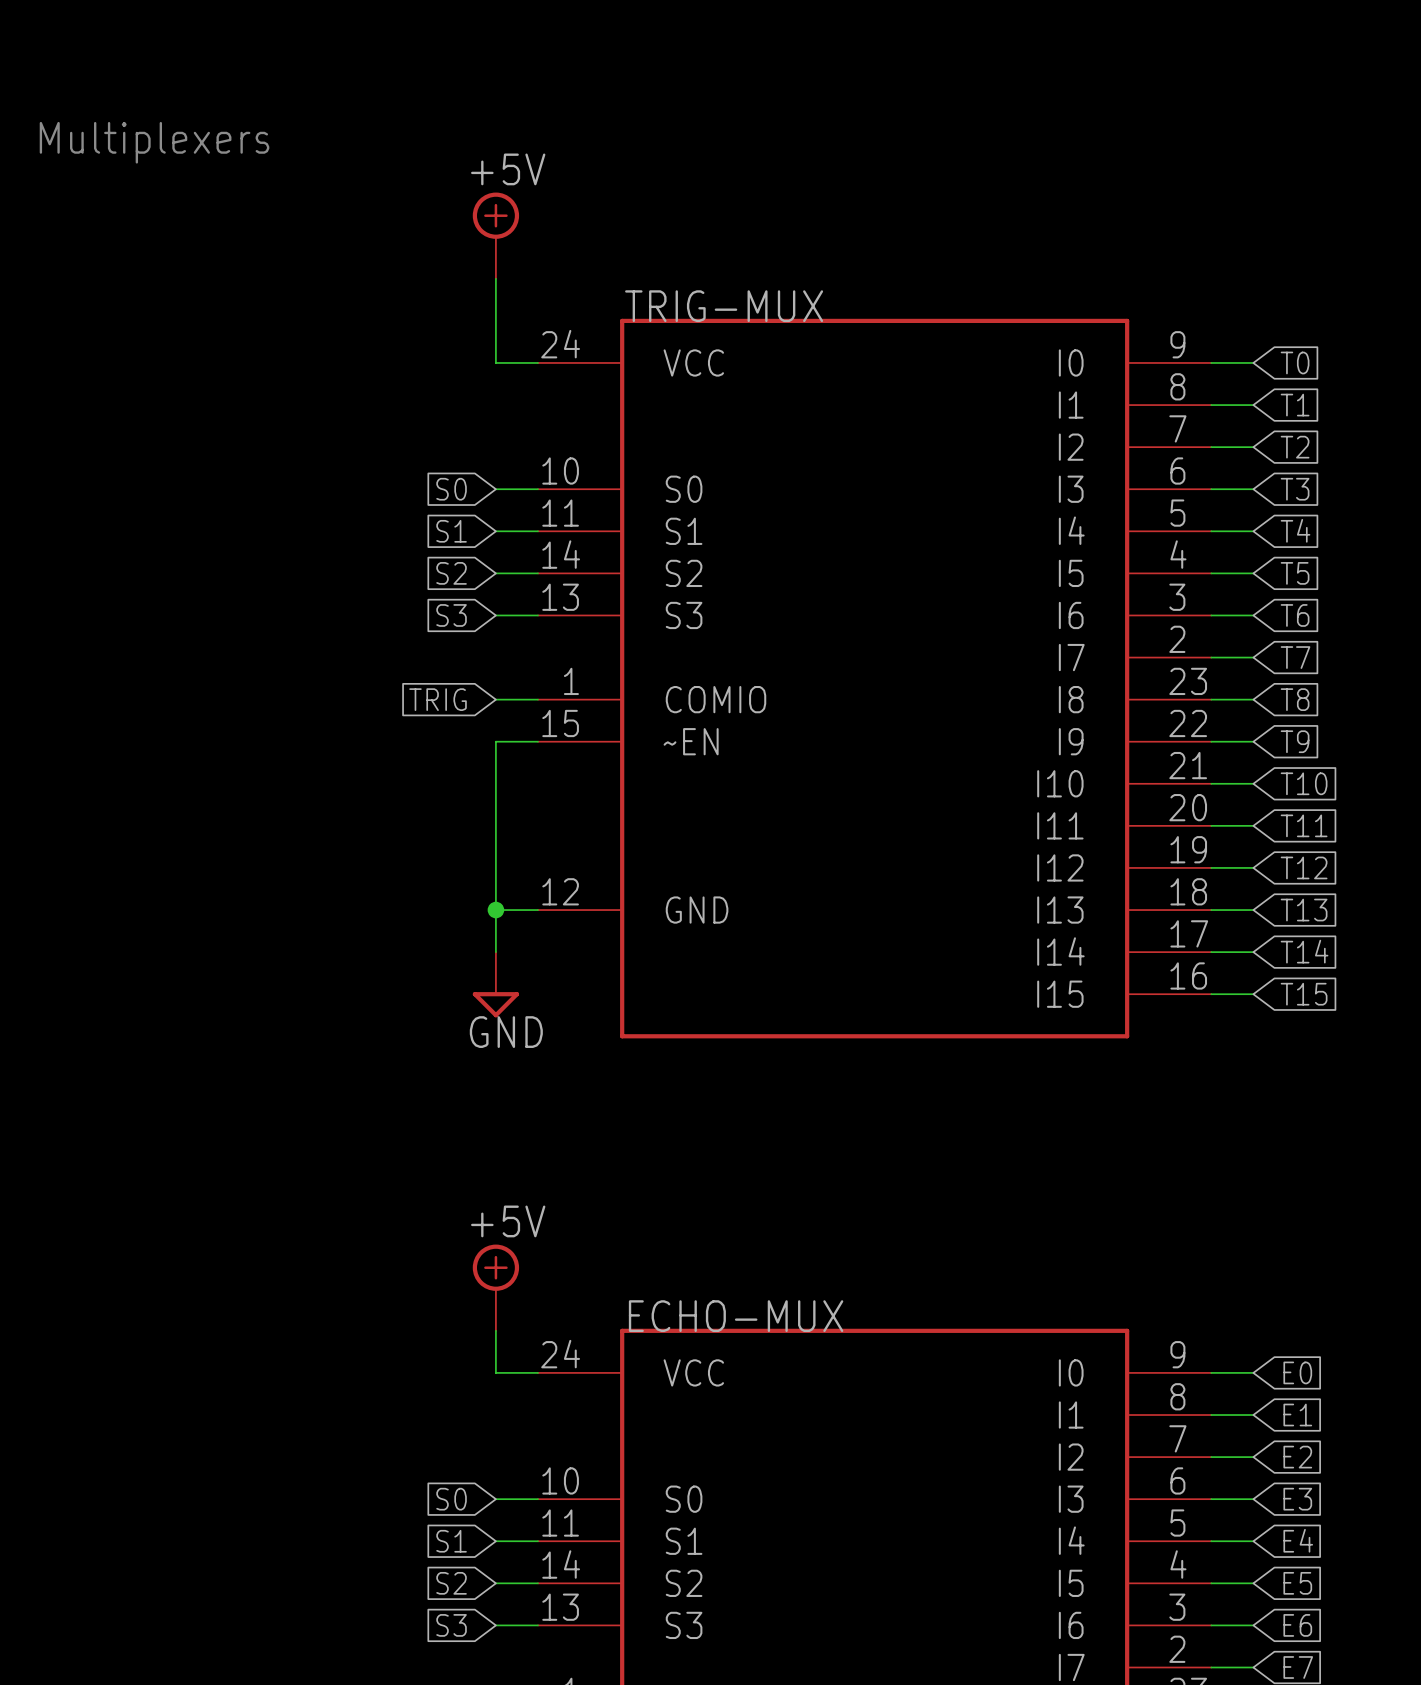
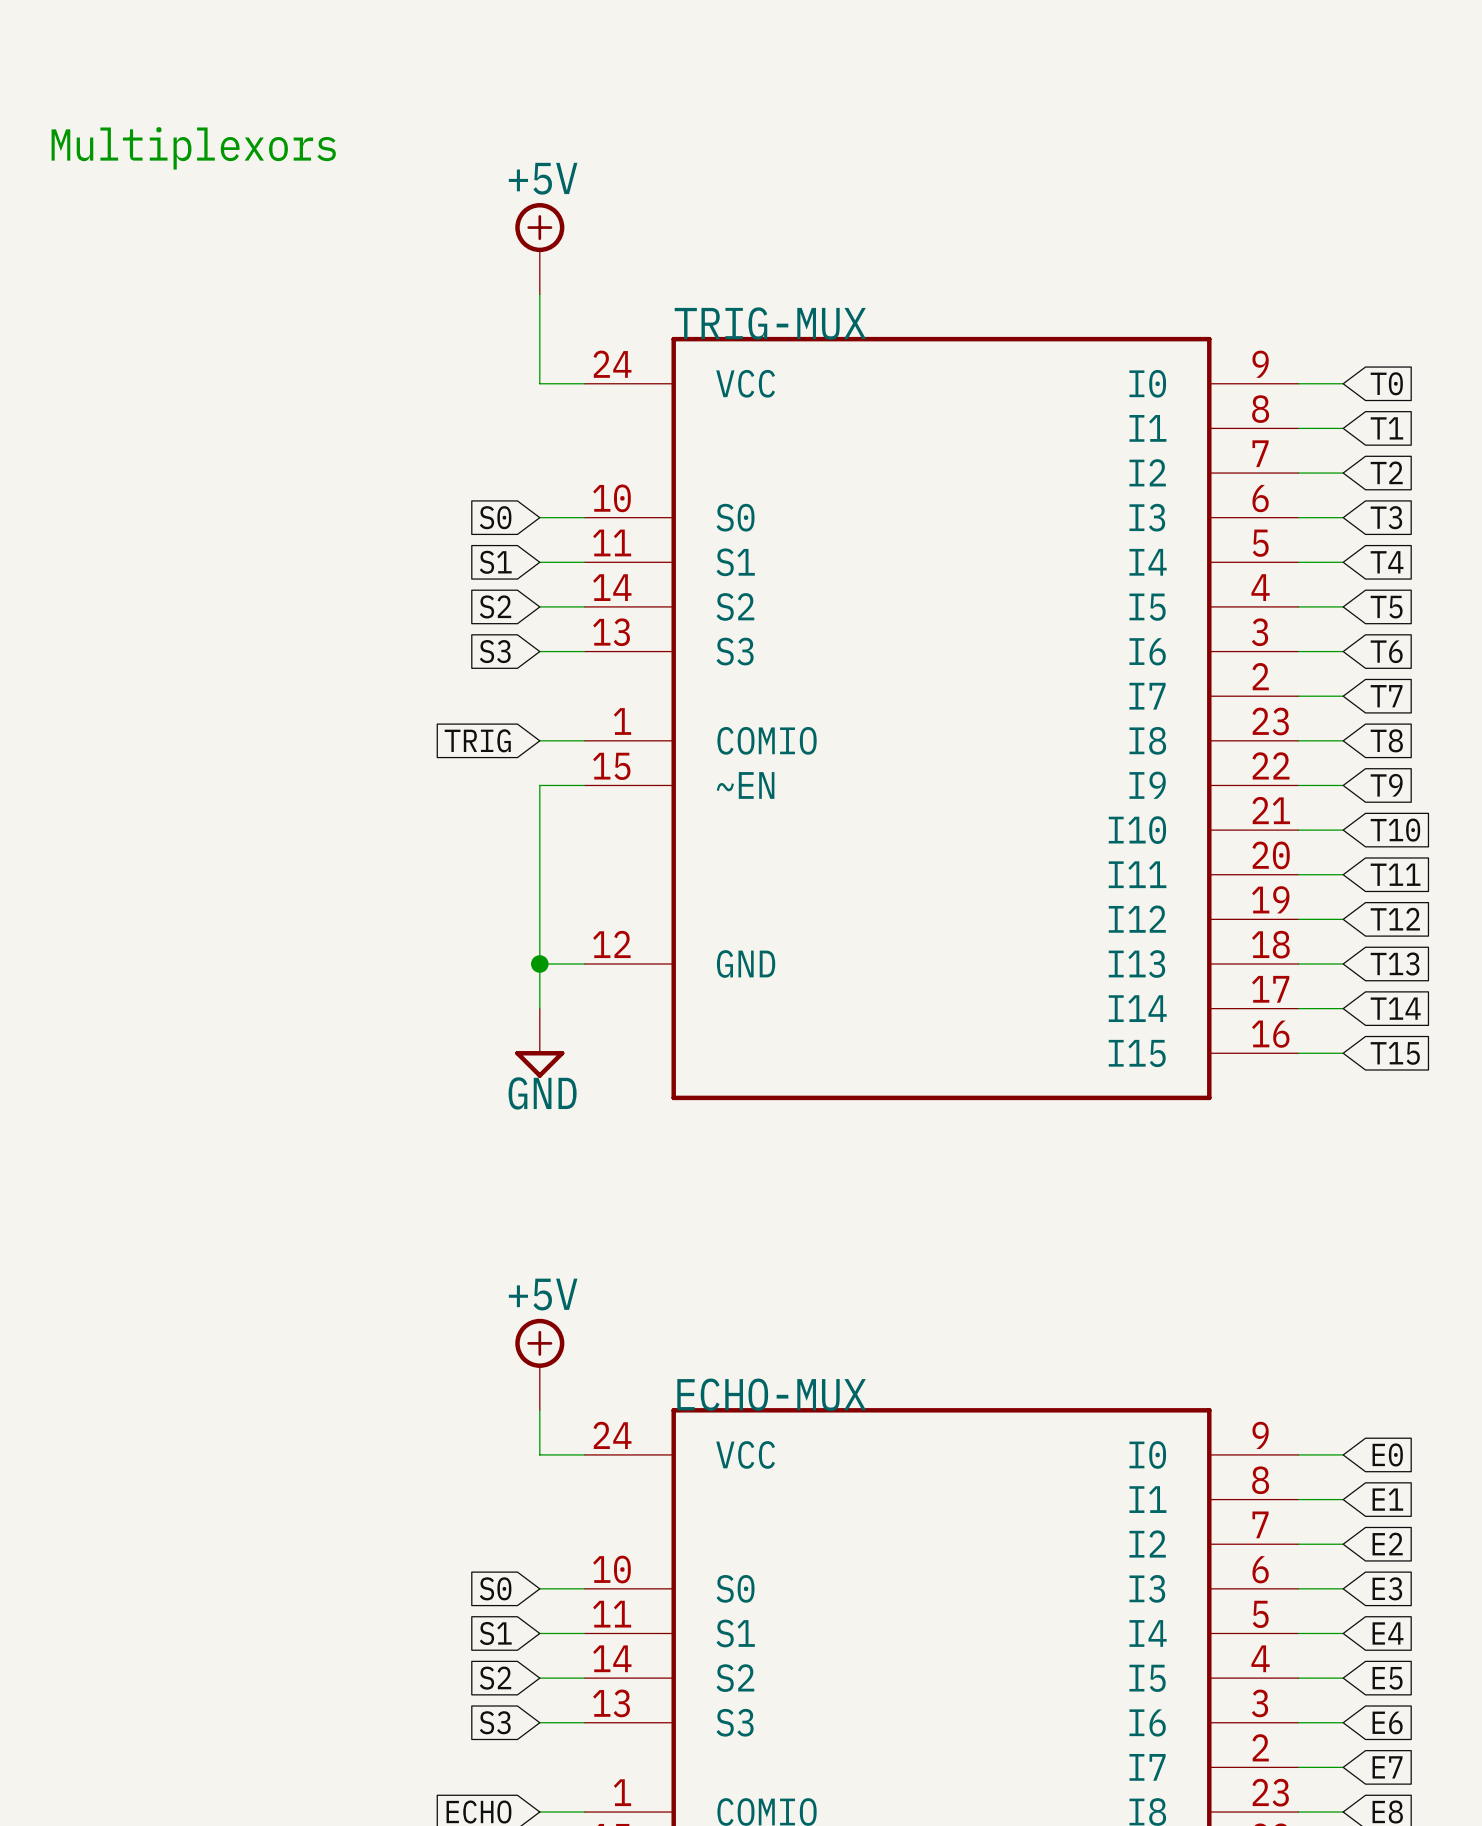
text: Multiplexers (154, 142) -> Multiplexors (193, 148)

